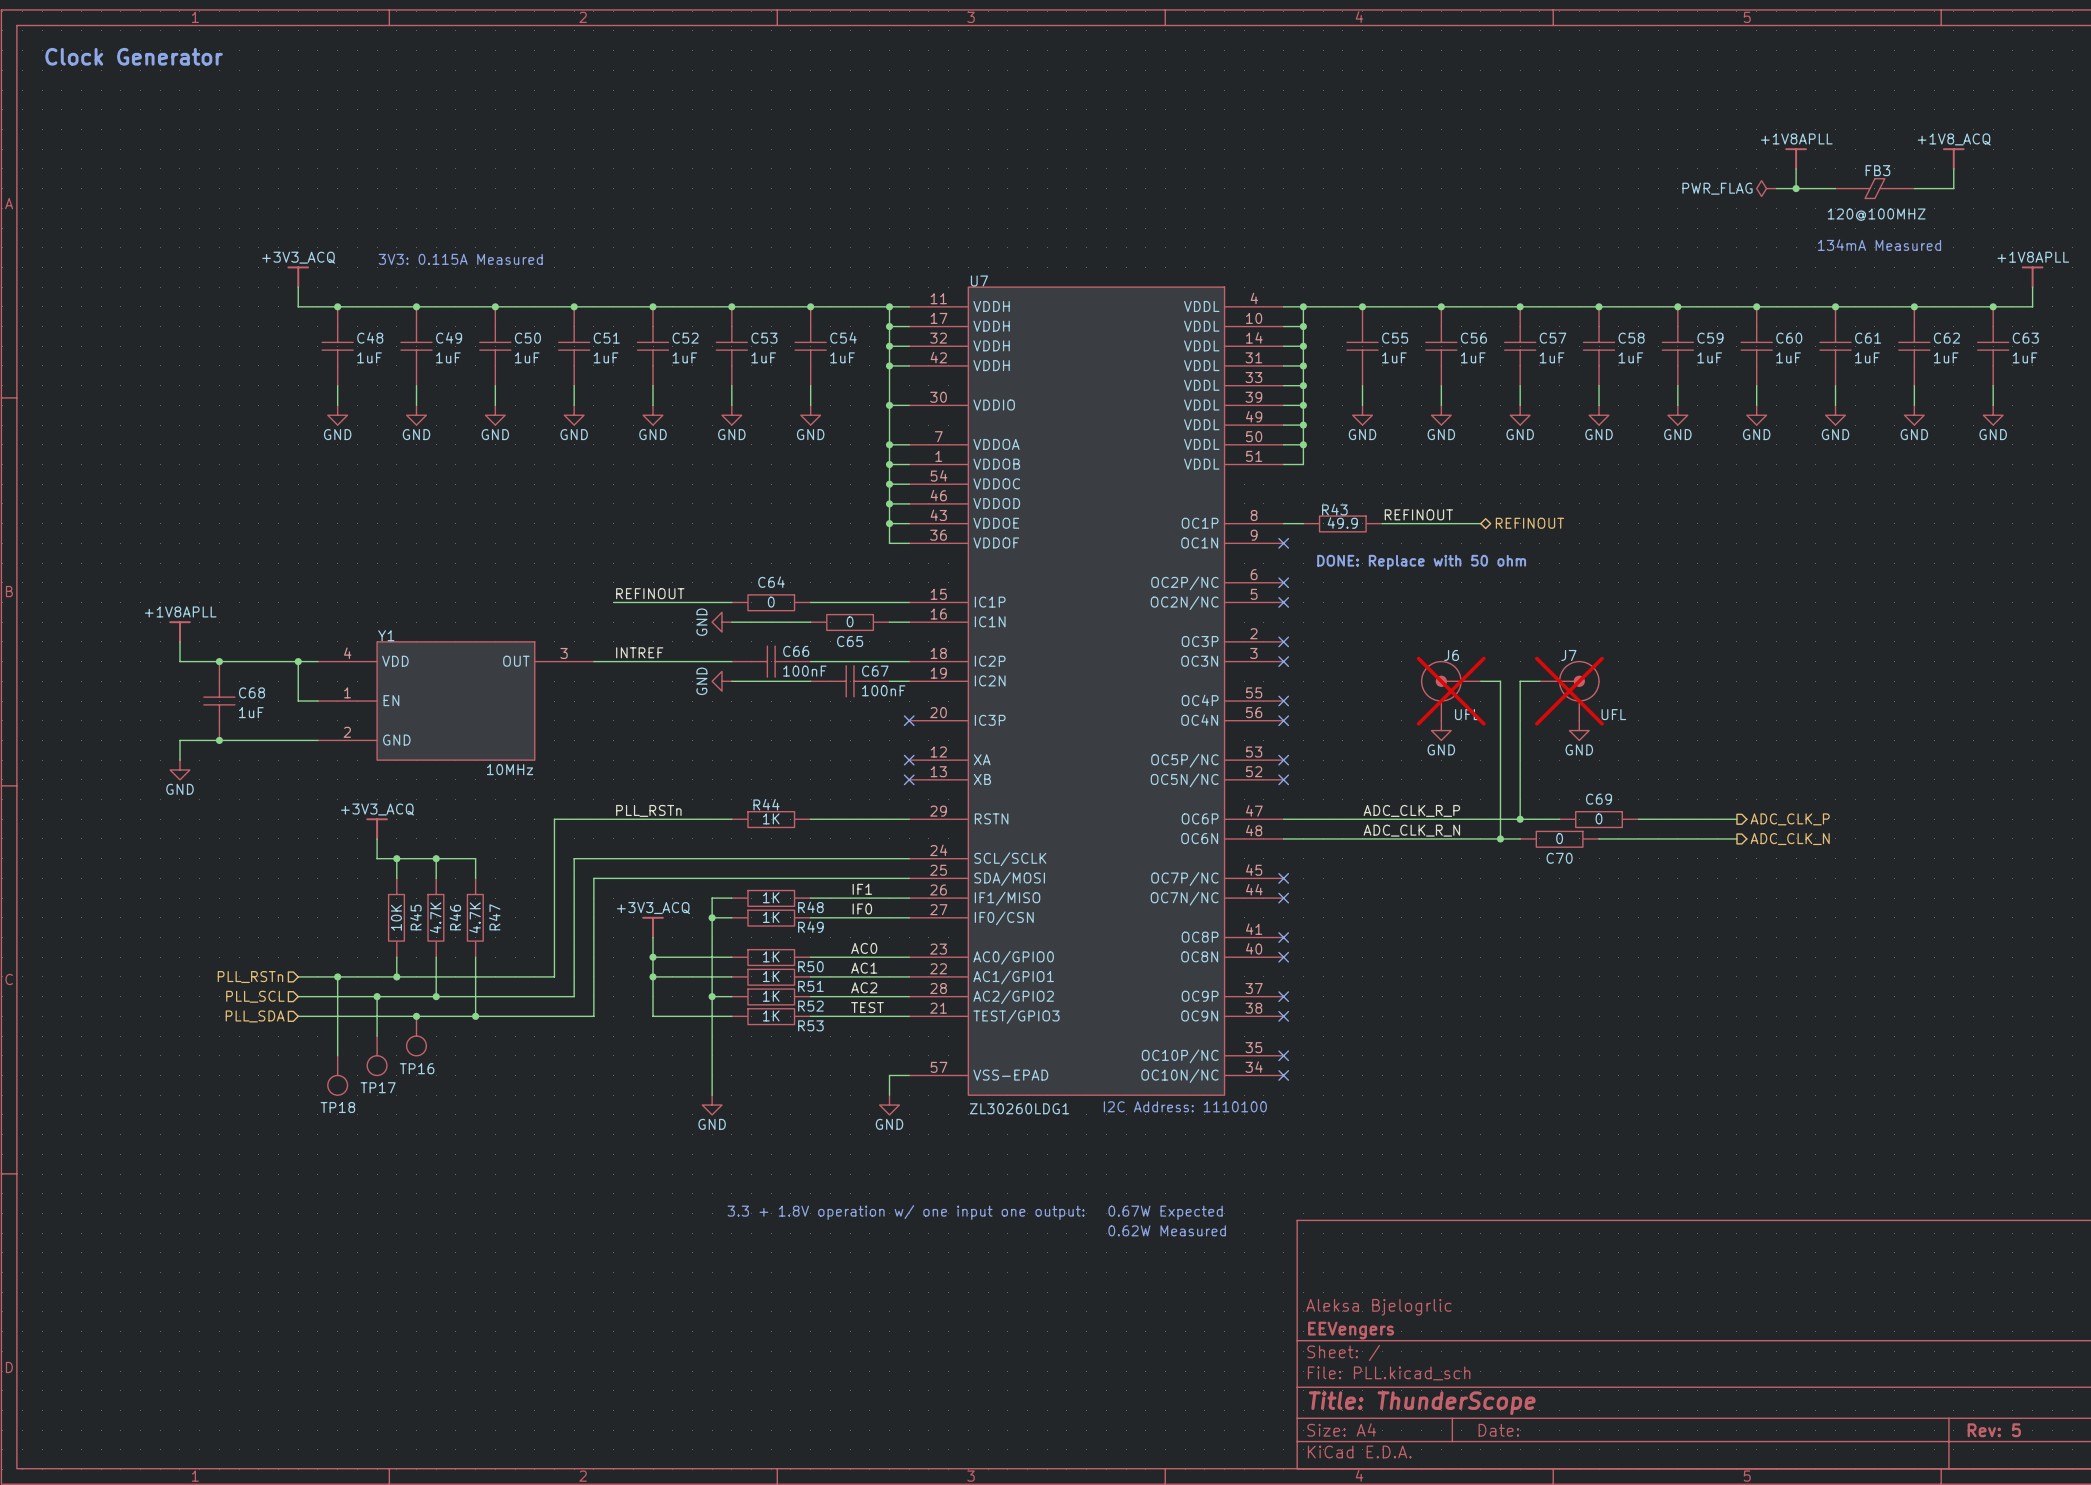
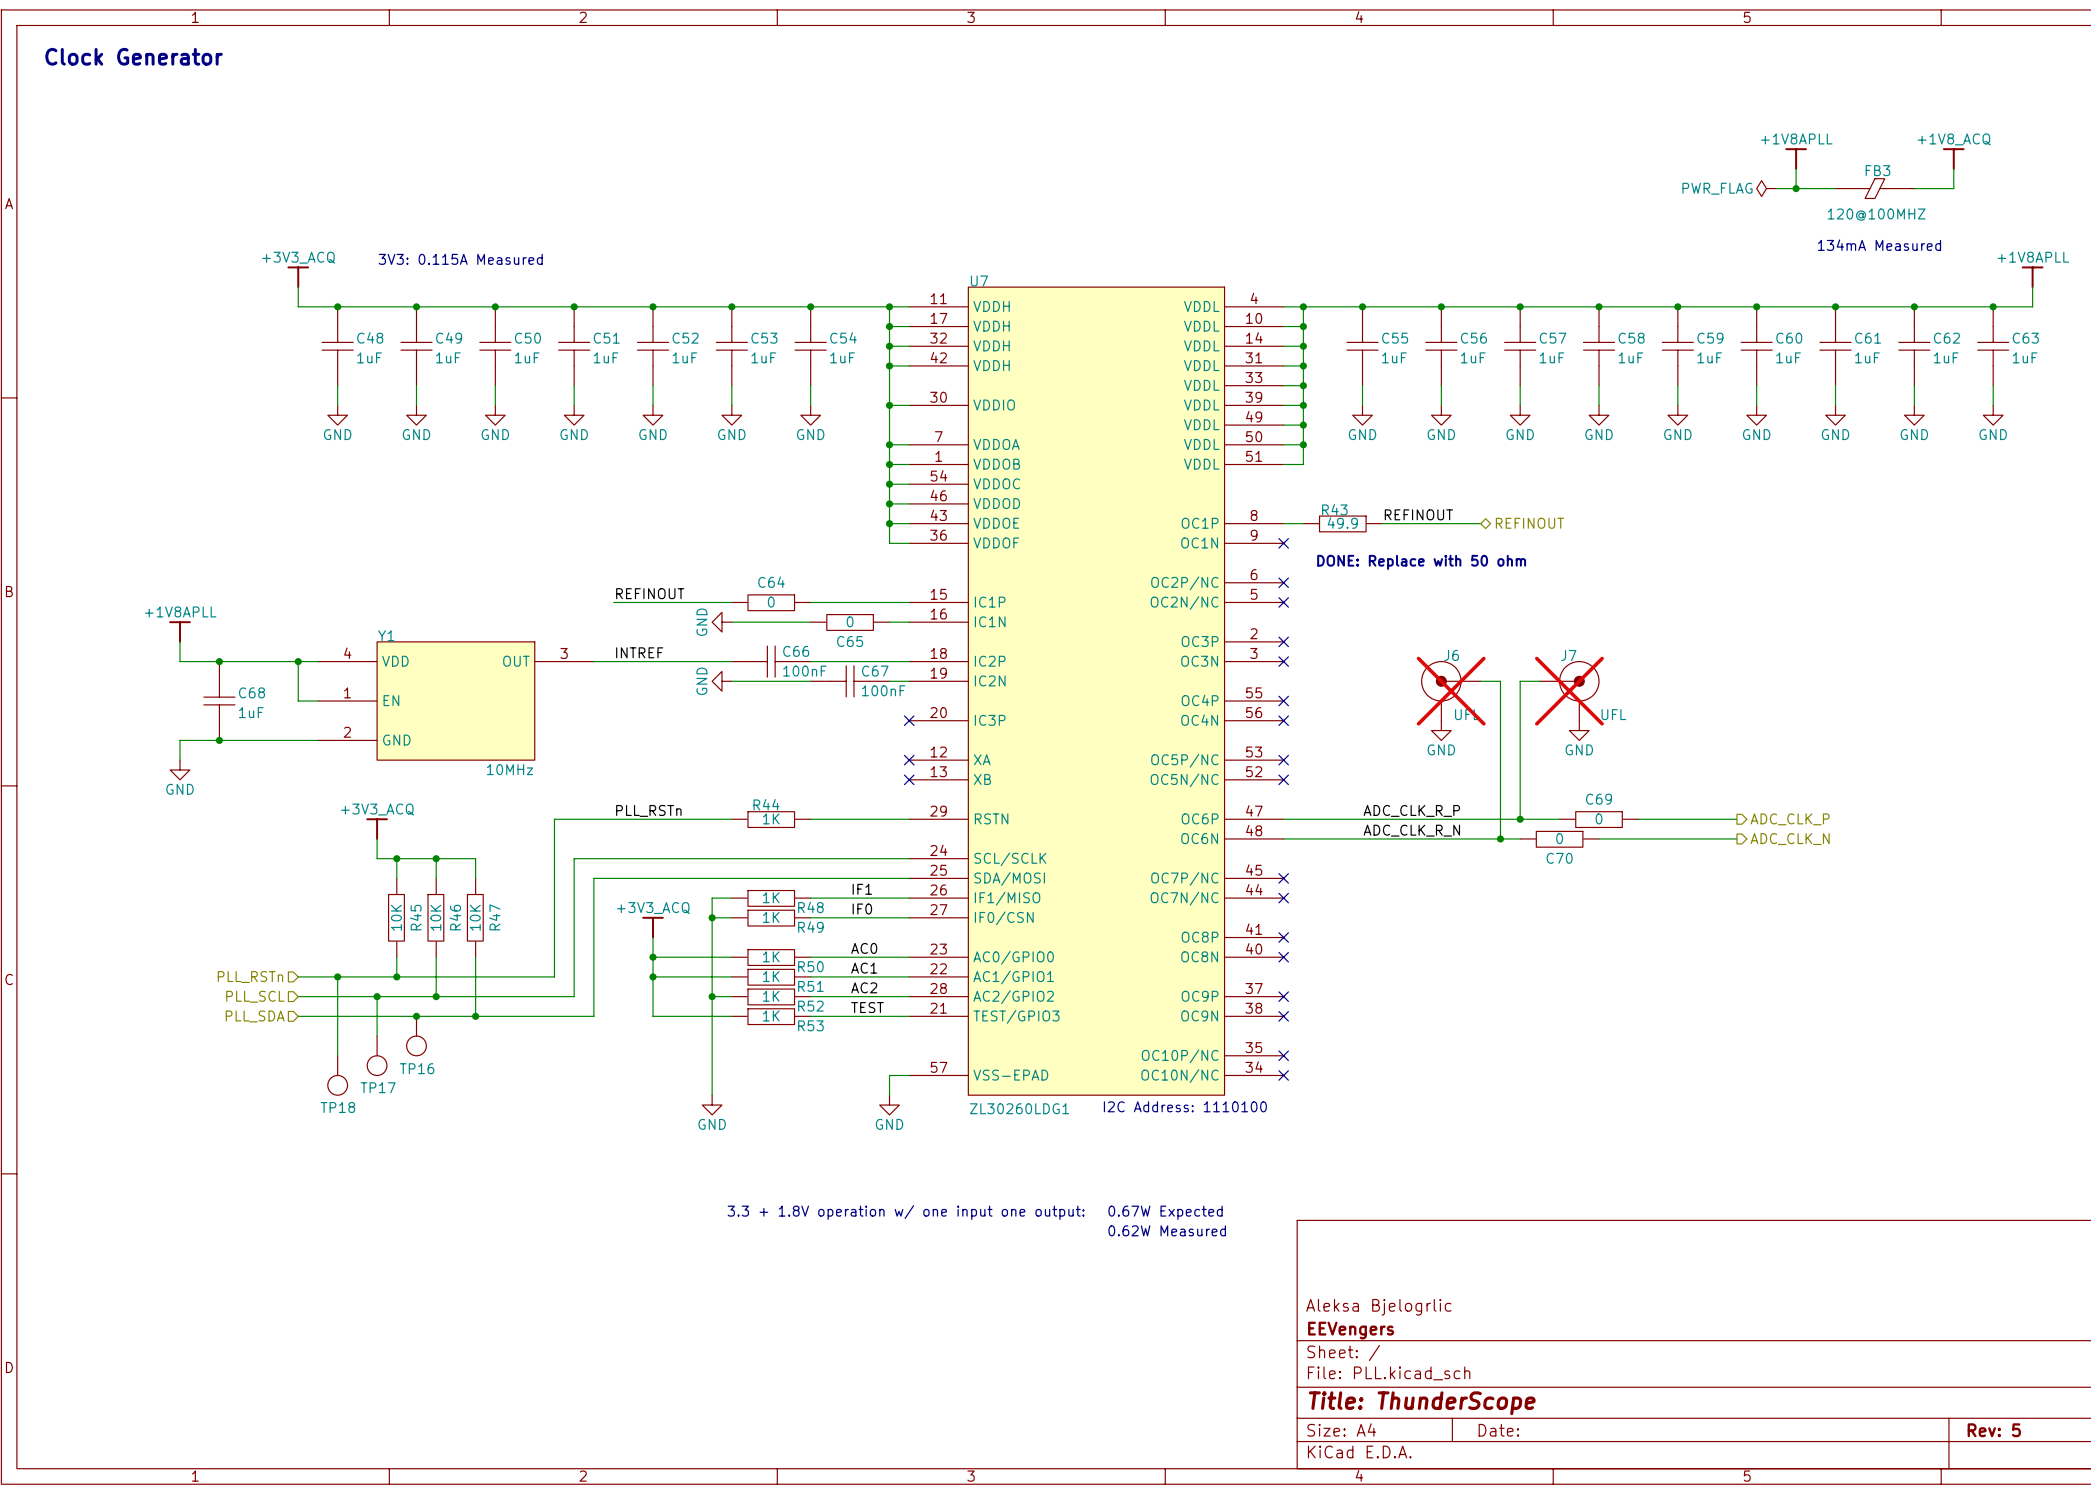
R46 value: 4.7K (435, 917) -> 10K (435, 917)
R47 value: 4.7K (475, 917) -> 10K (475, 917)

